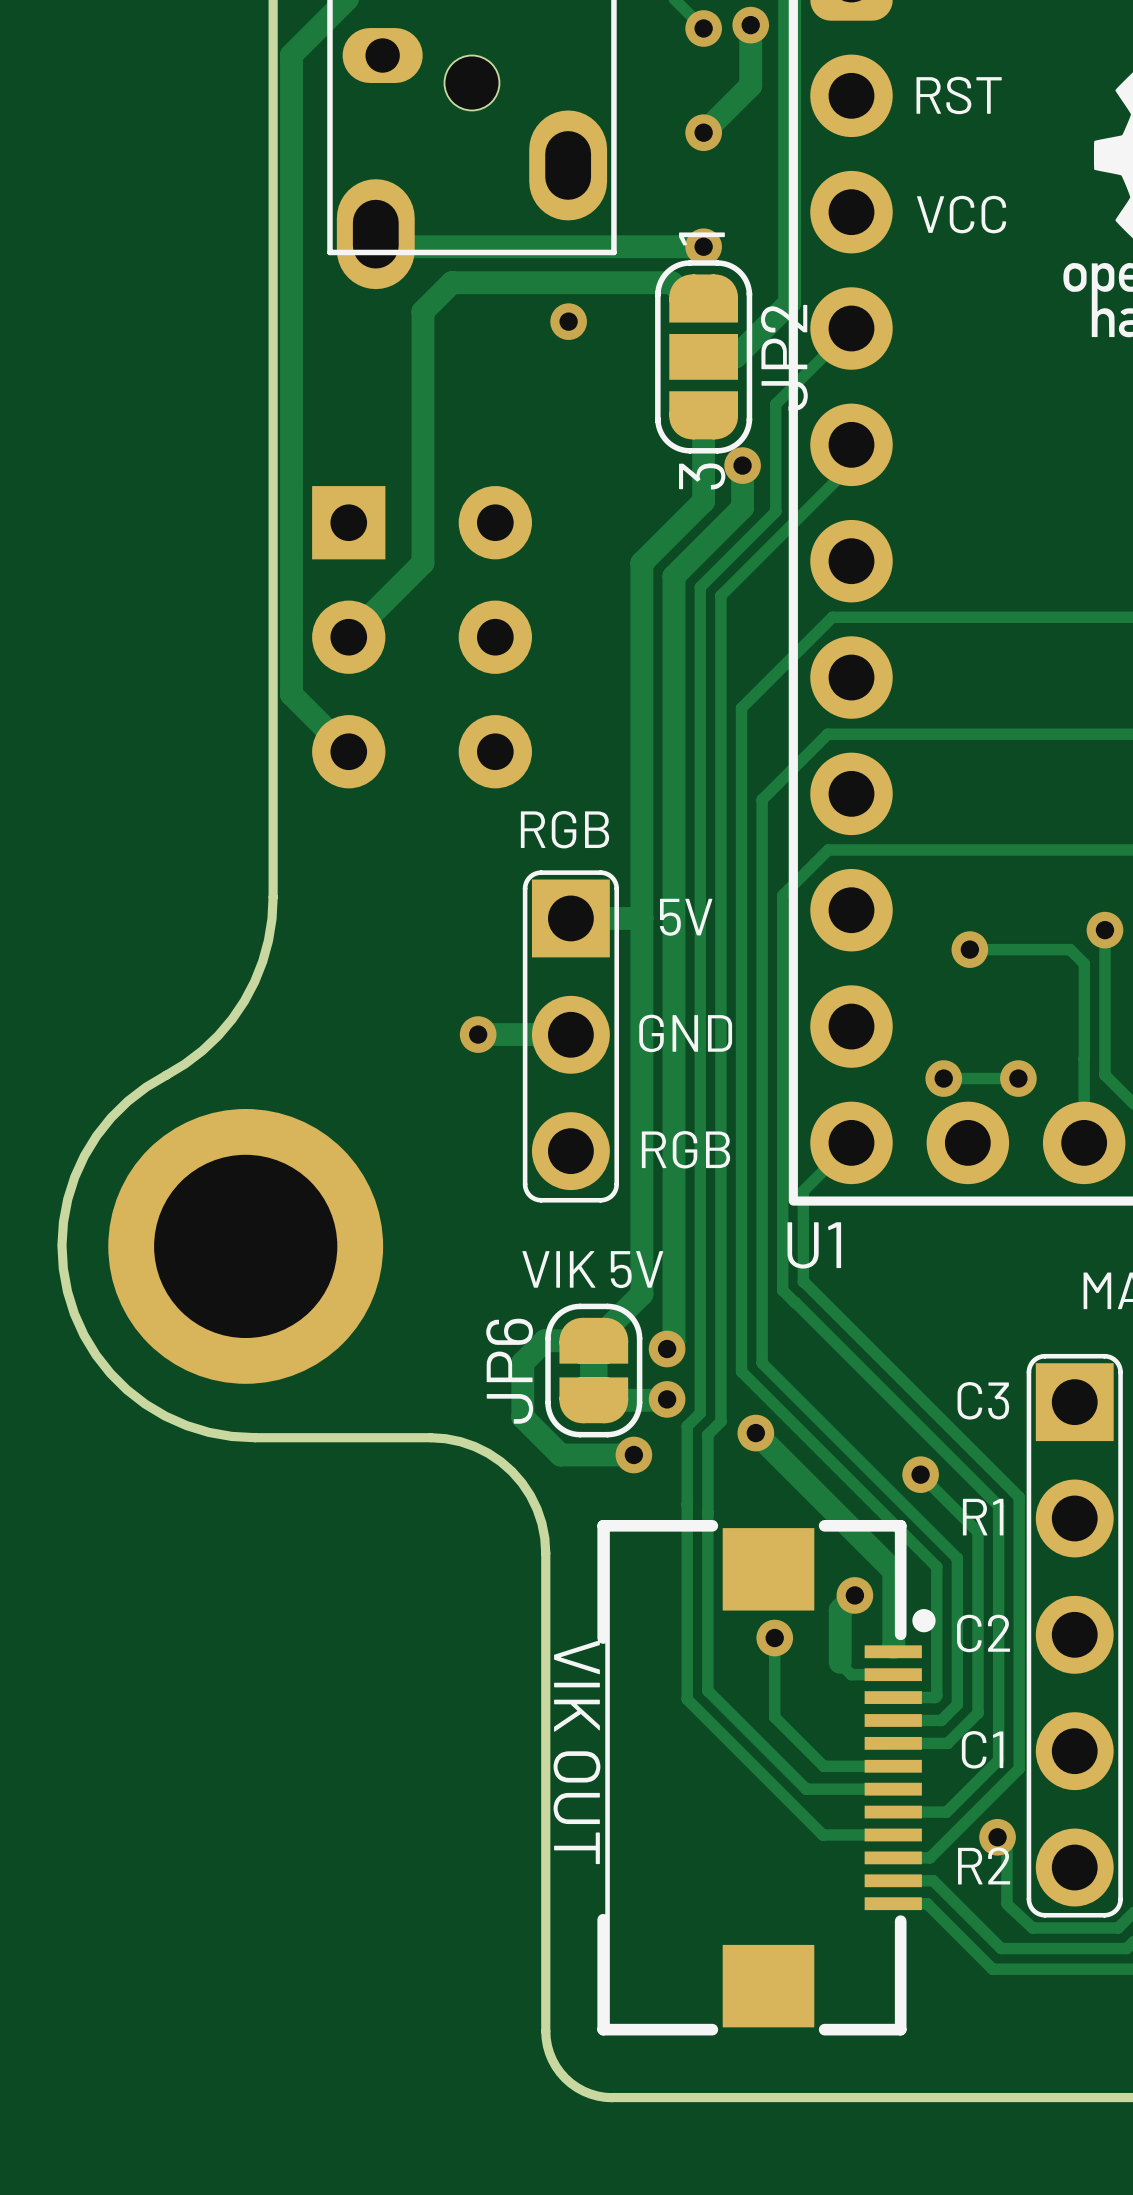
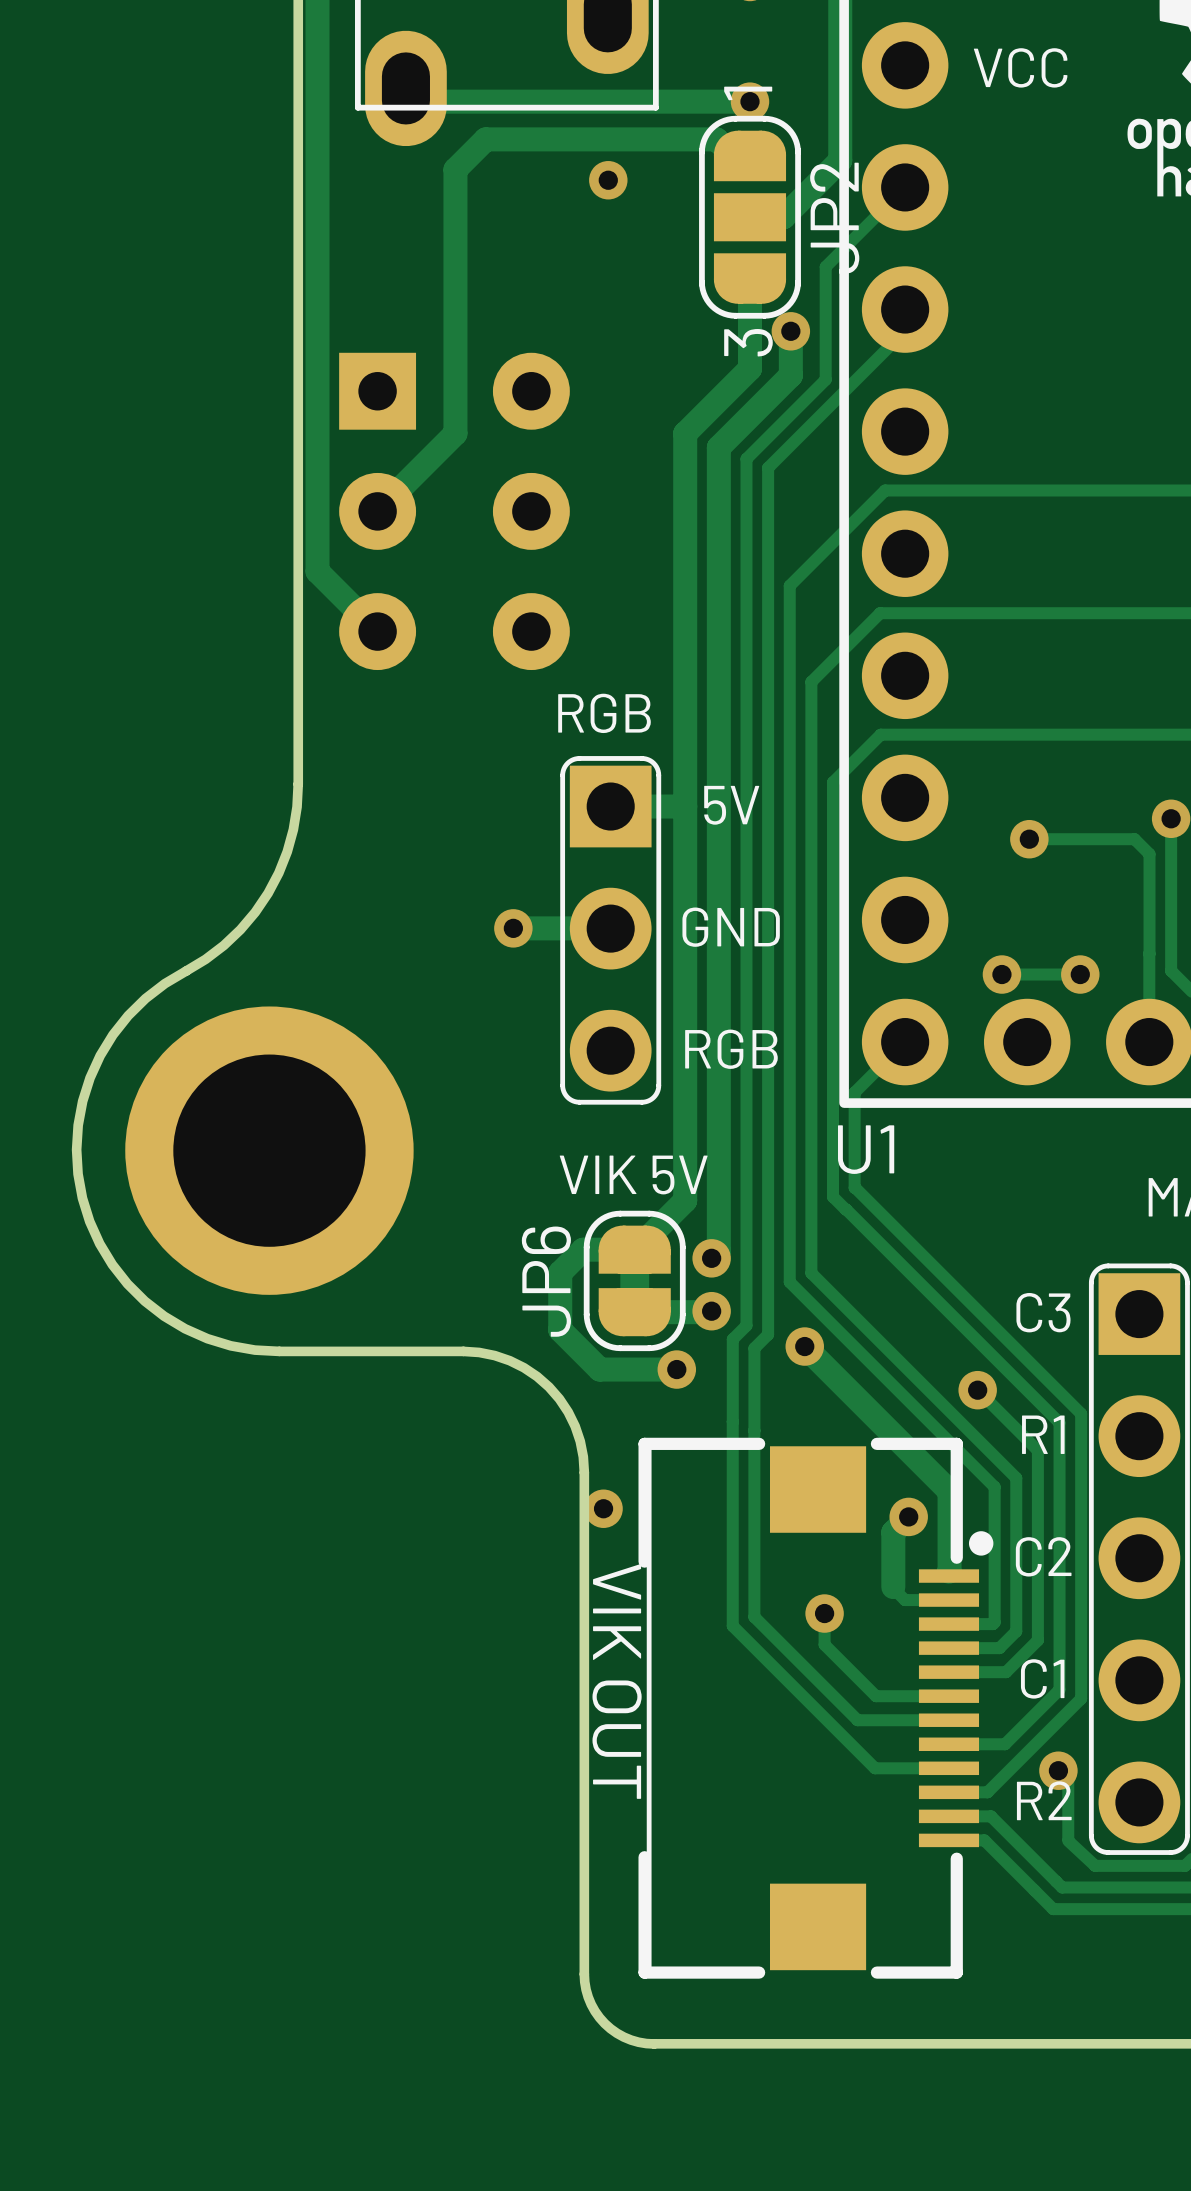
via: none -> (603, 1508)
track: (774, 1638) (774, 1687) -> none
via position: (774, 1638) -> (824, 1613)

